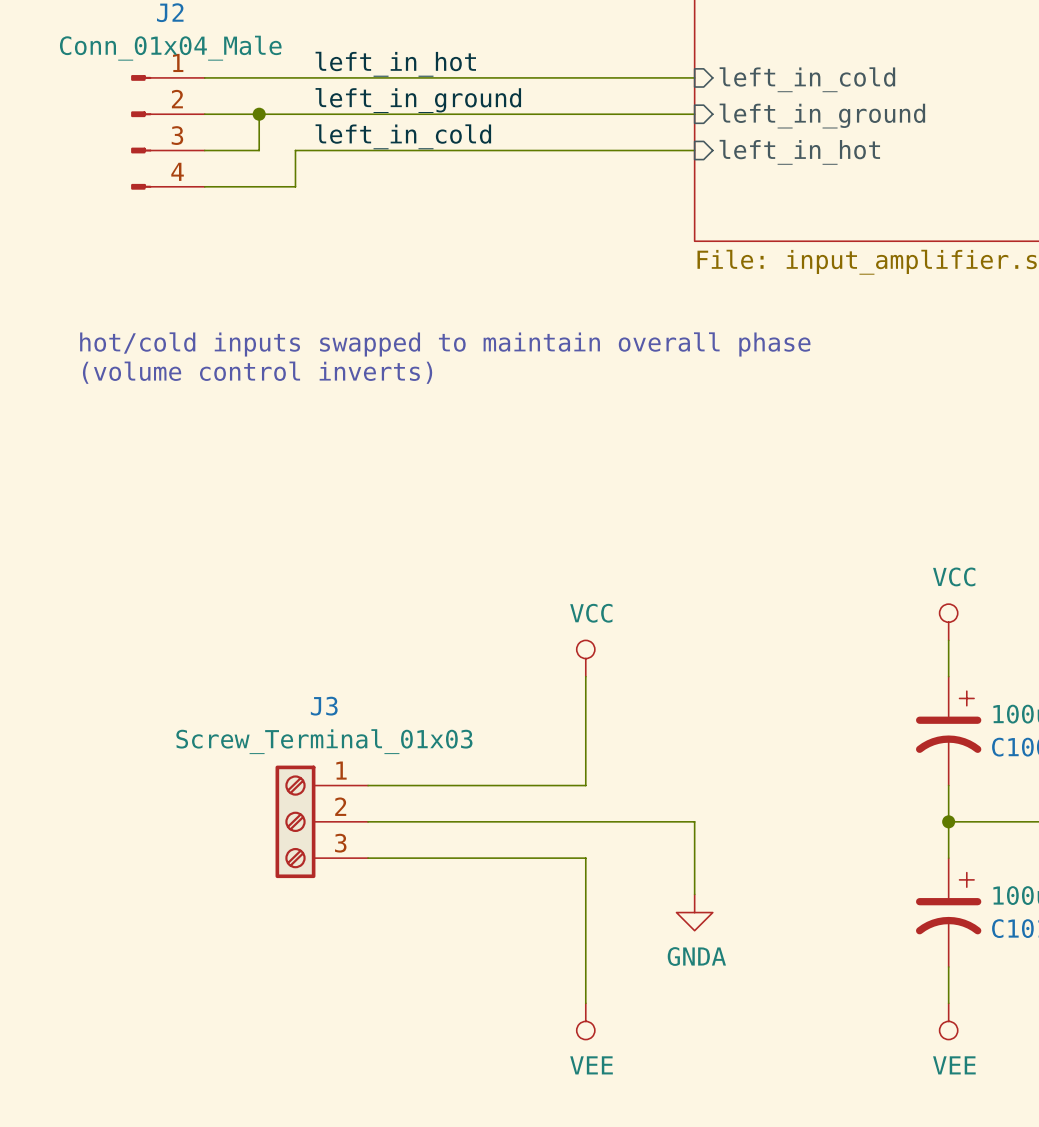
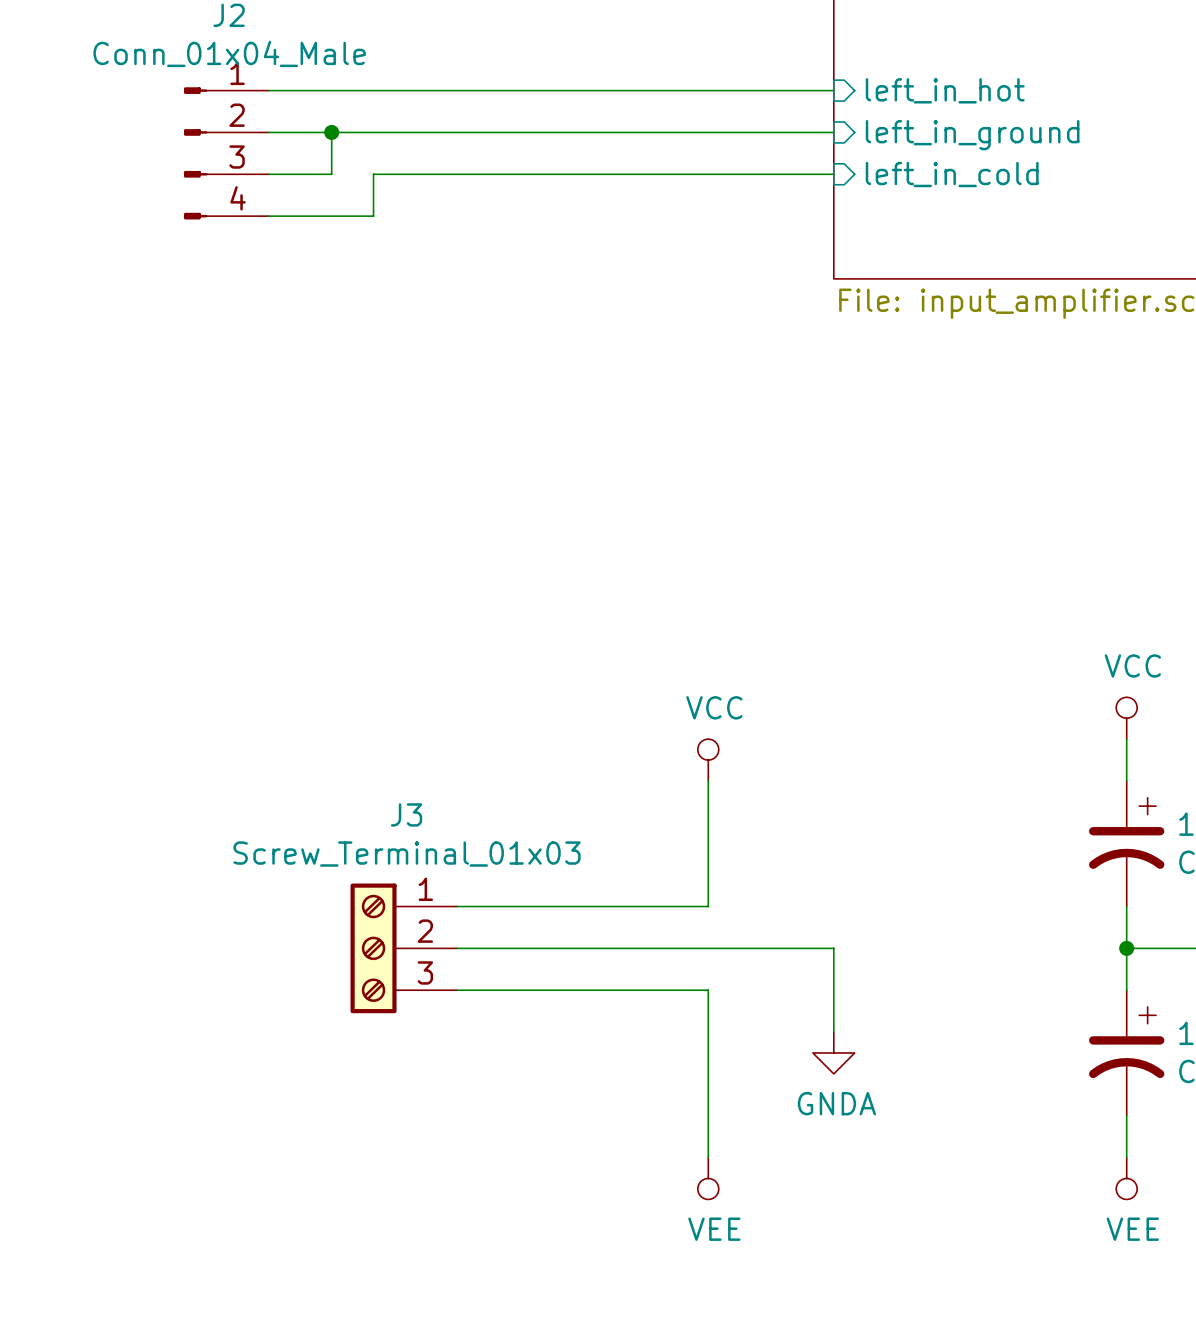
label: left_in_hot (395, 64) -> none
sheet pin: left_in_cold (807, 79) -> left_in_hot (945, 90)
label: left_in_ground (418, 100) -> none
label: left_in_cold (403, 136) -> none
sheet pin: left_in_hot (799, 152) -> left_in_cold (952, 174)
text: hot/cold inputs swapped to maintain overall phase (445, 344) -> none
text: (volume control inverts) (257, 372) -> none

